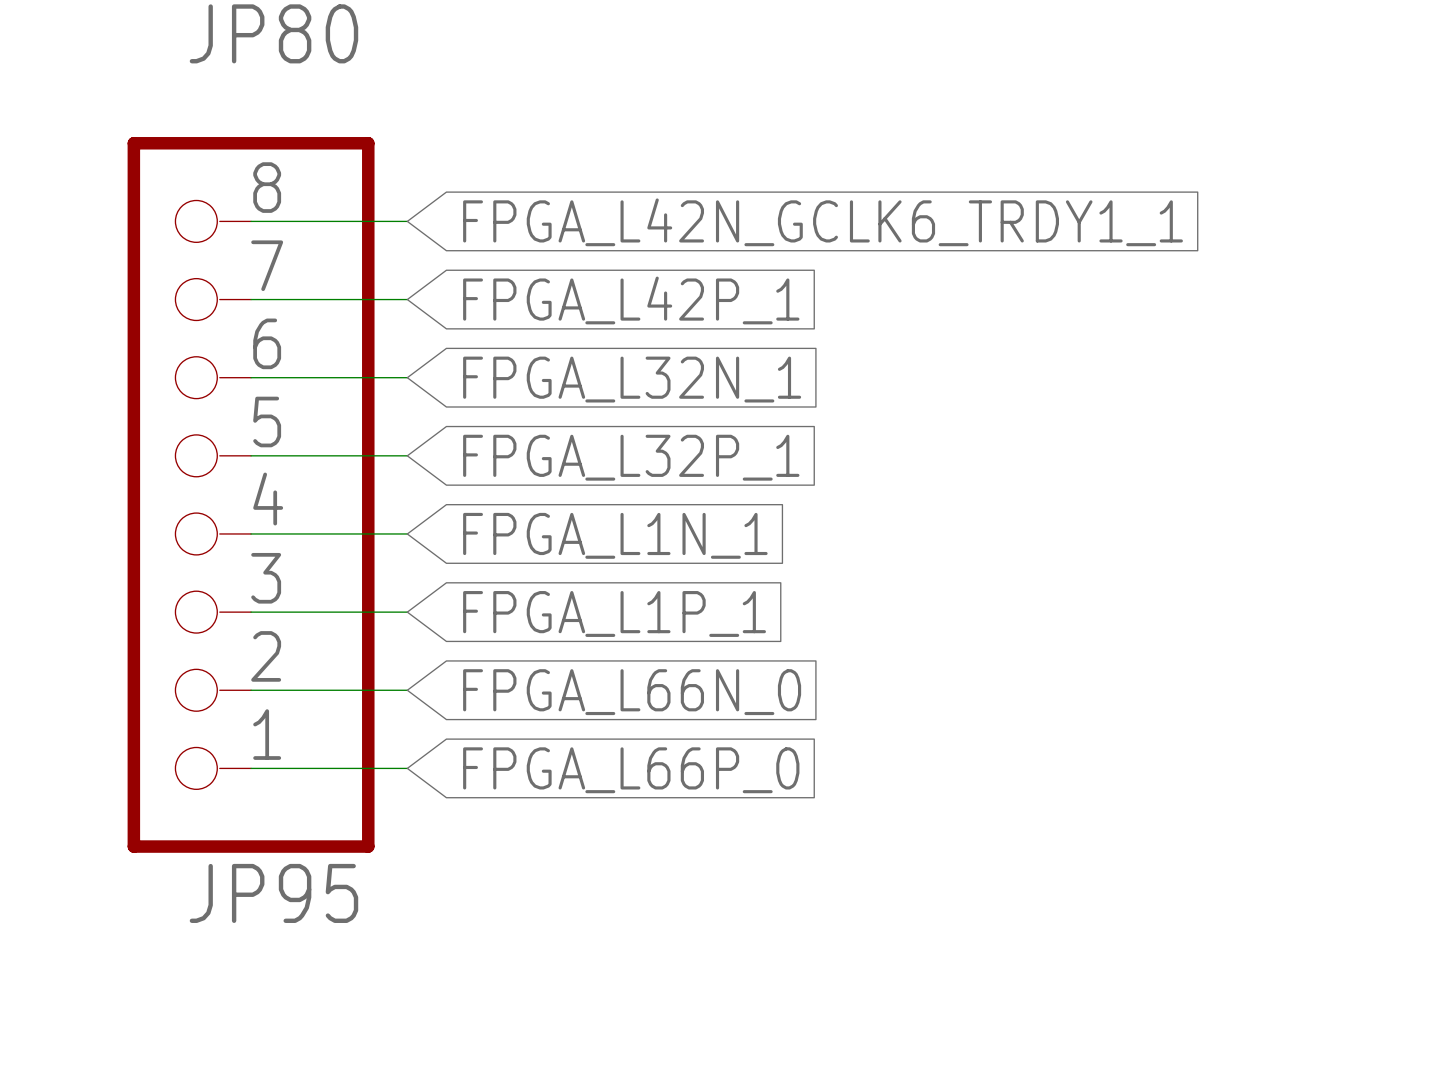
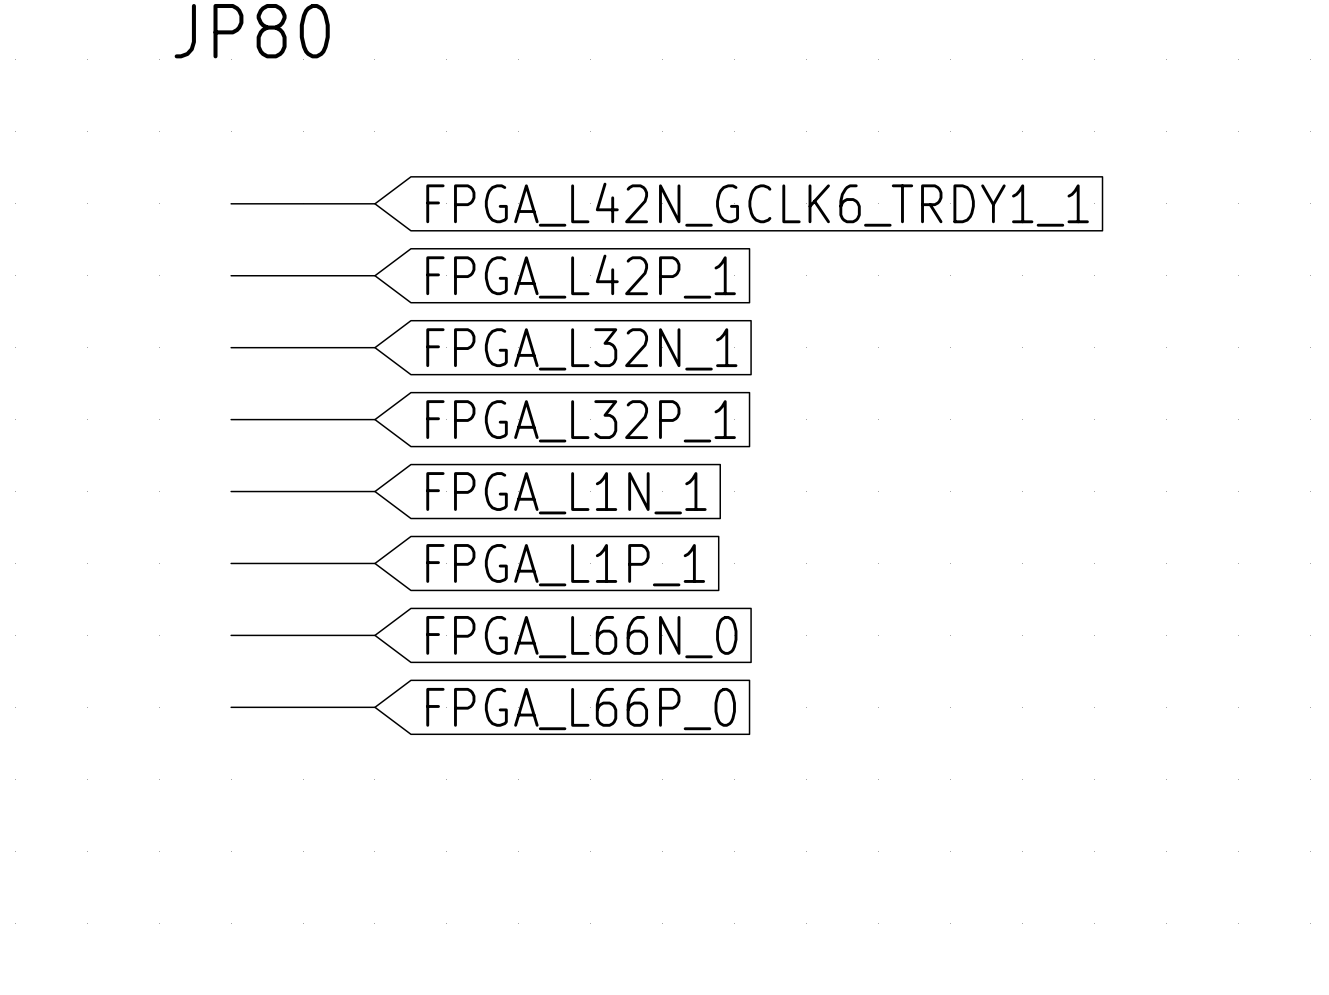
JP95: (251, 494) -> none

